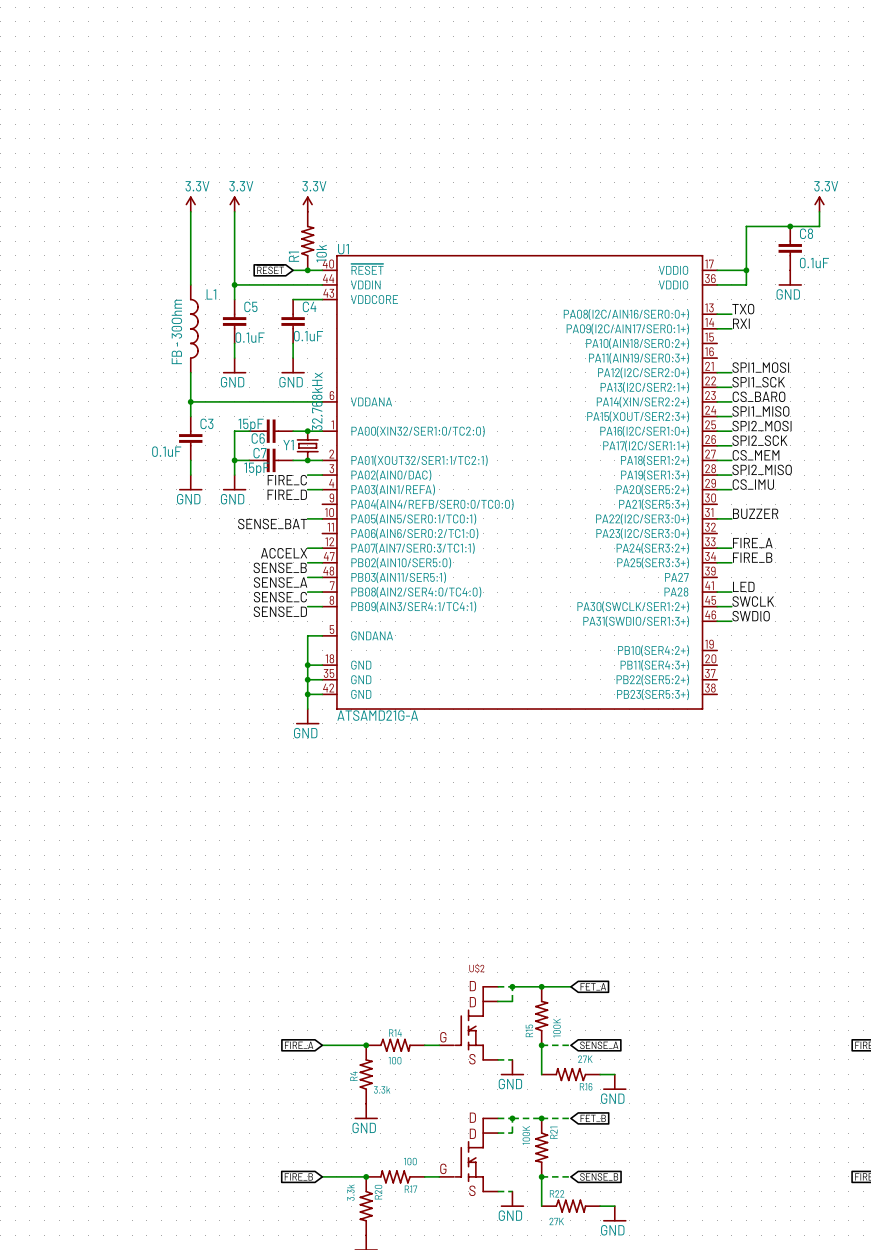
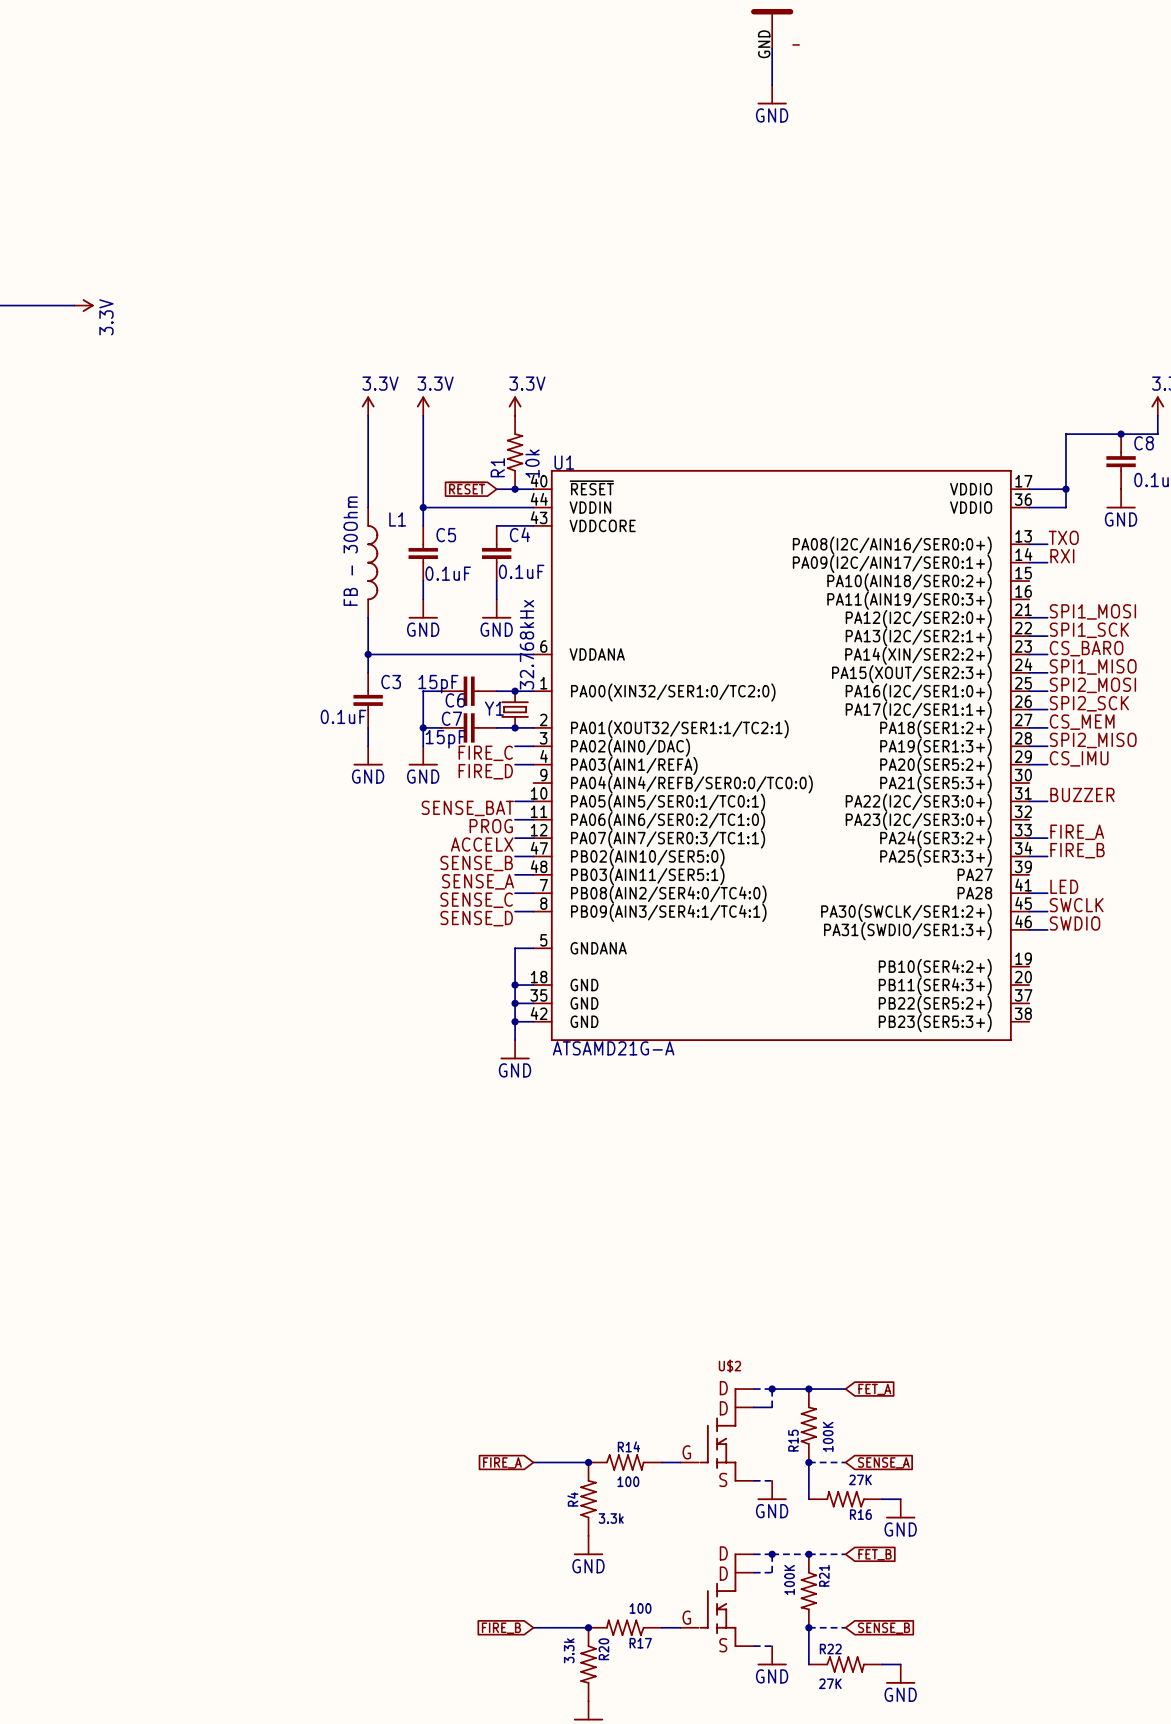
wire: none -> (515, 819) (533, 819)
label: none -> PROG (491, 826)

